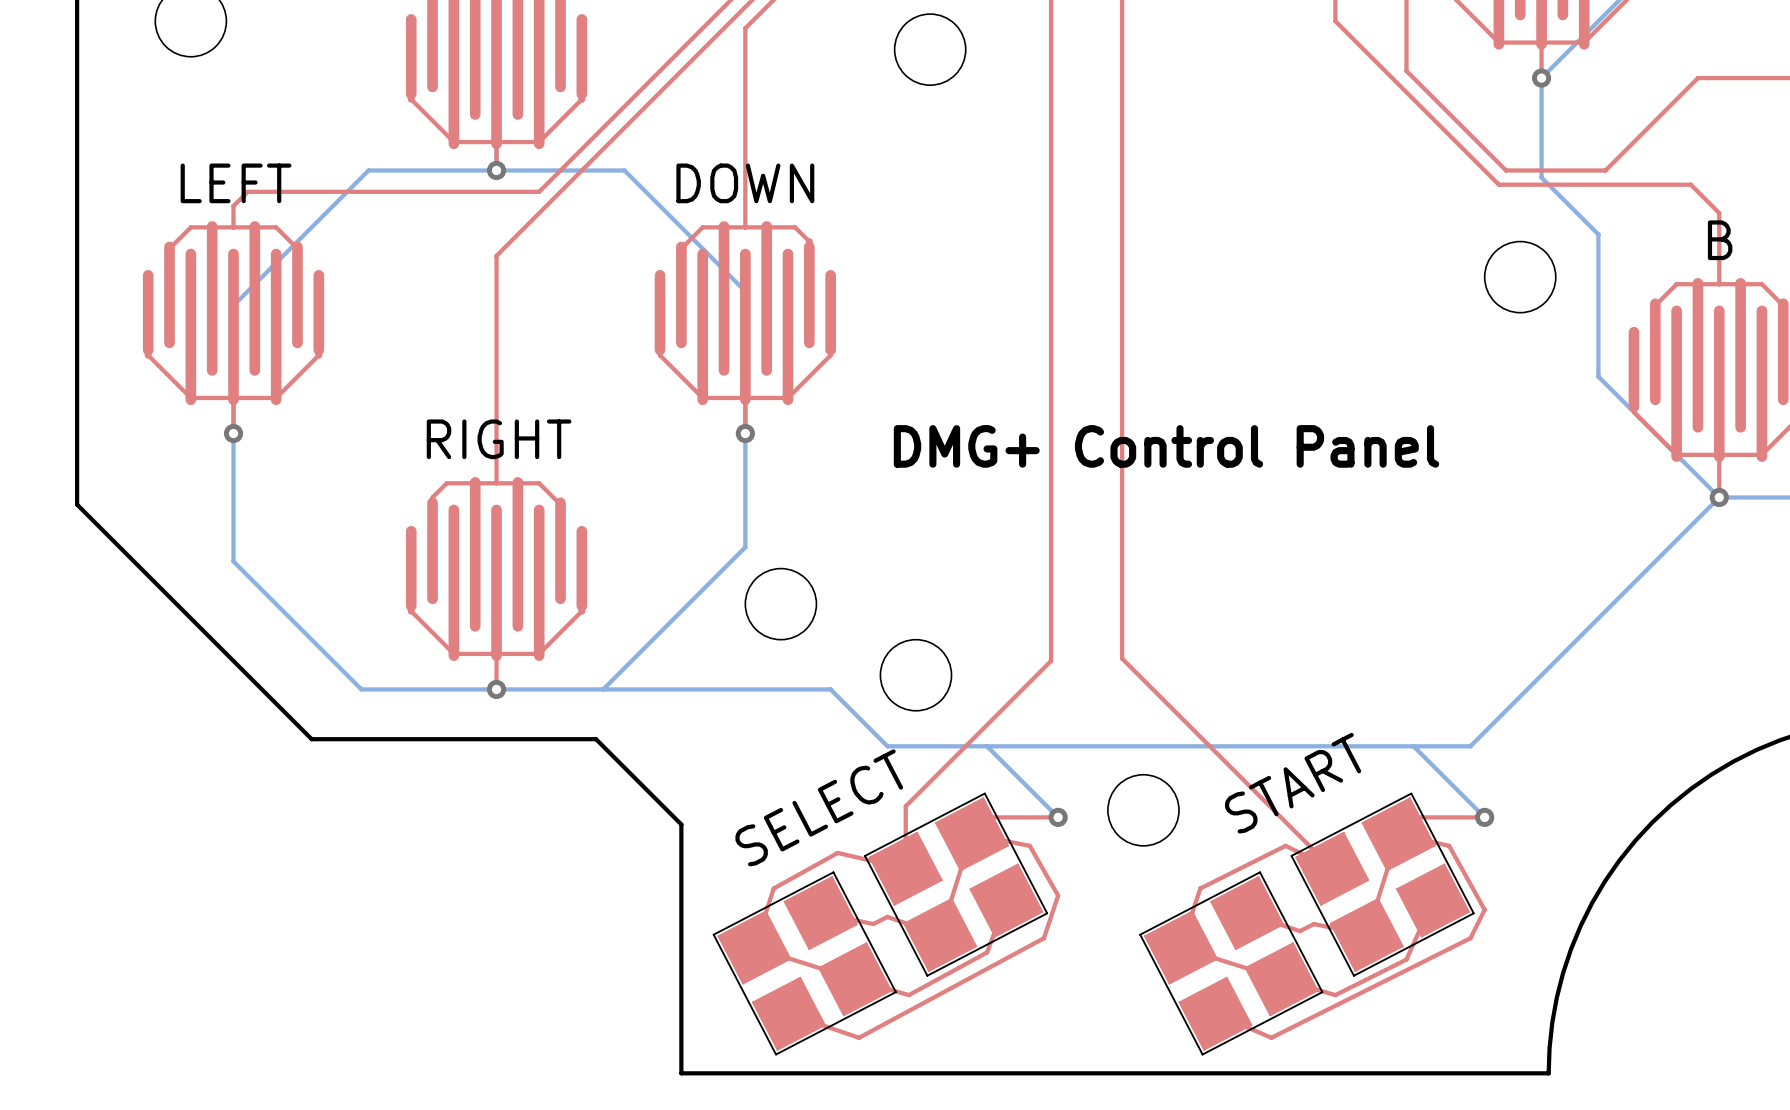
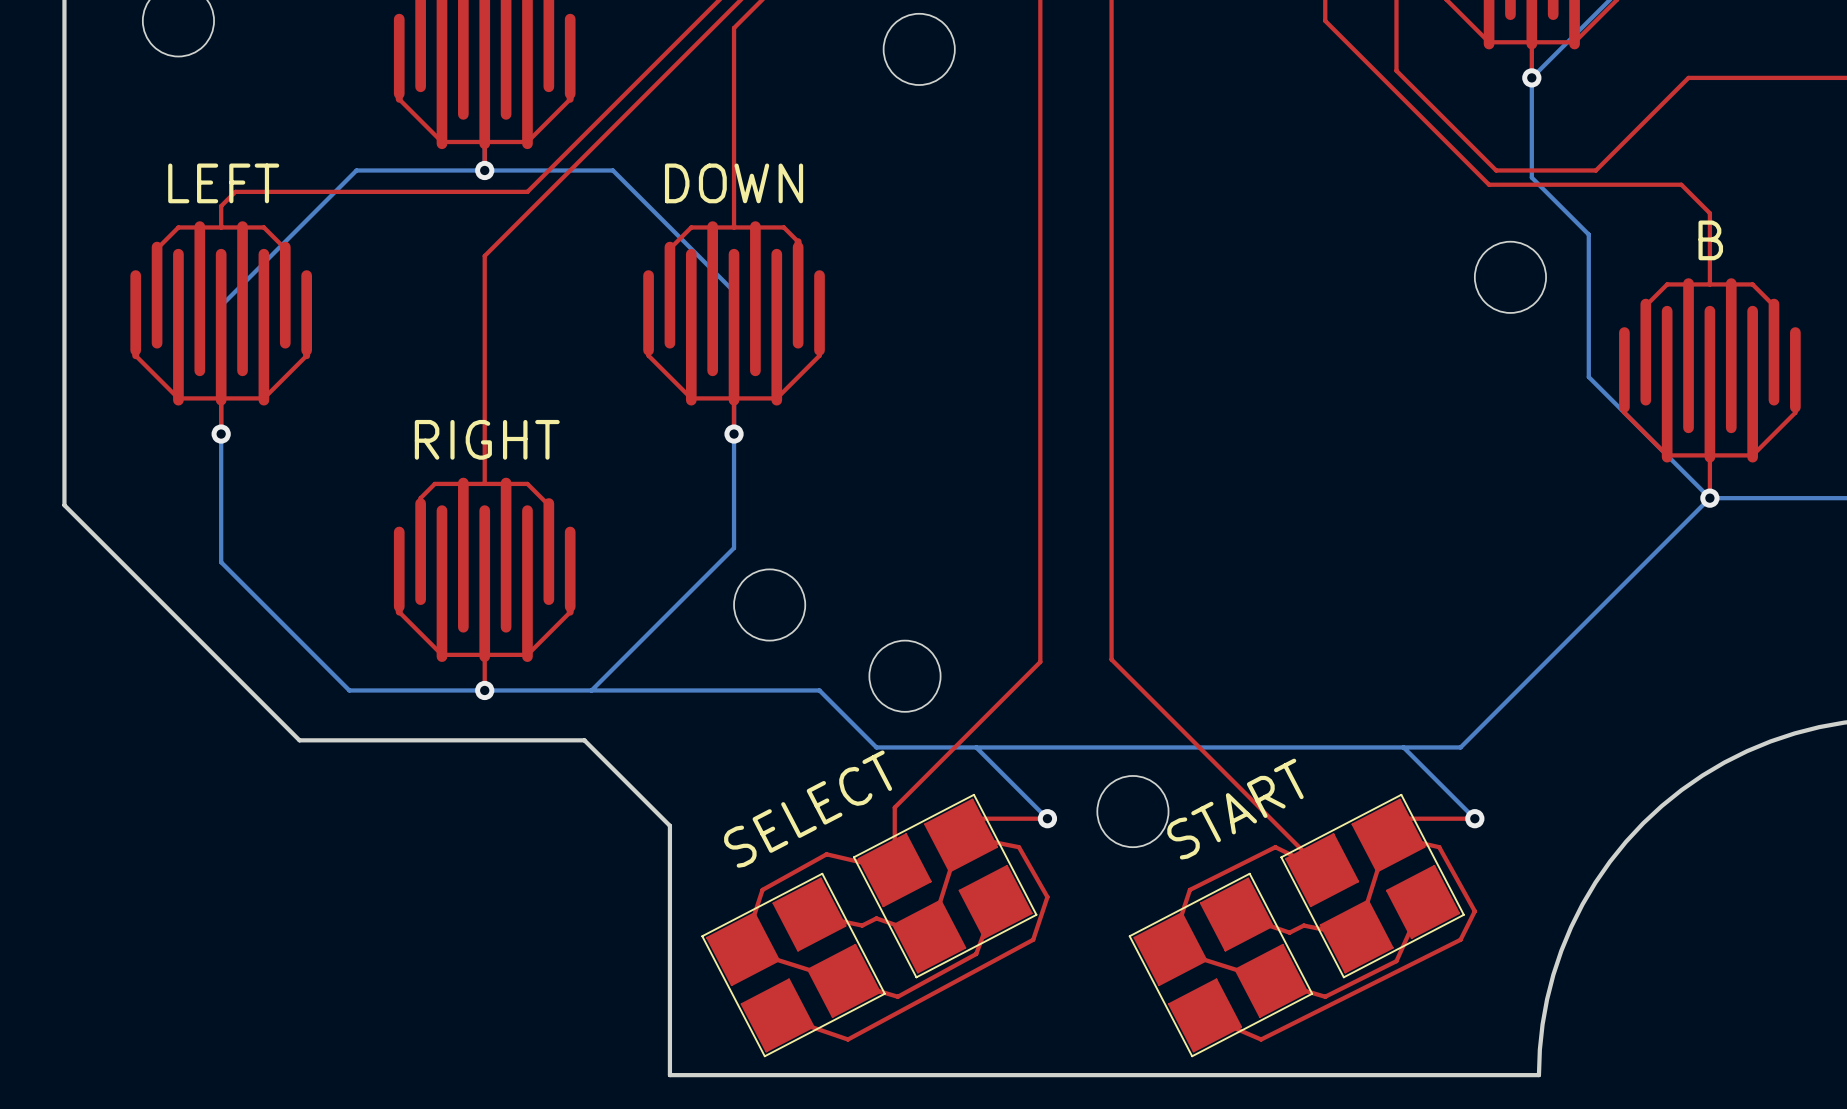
text: DMG+ Control Panel (1166, 446) -> none
part value position: START (1293, 783) -> START (1235, 809)

